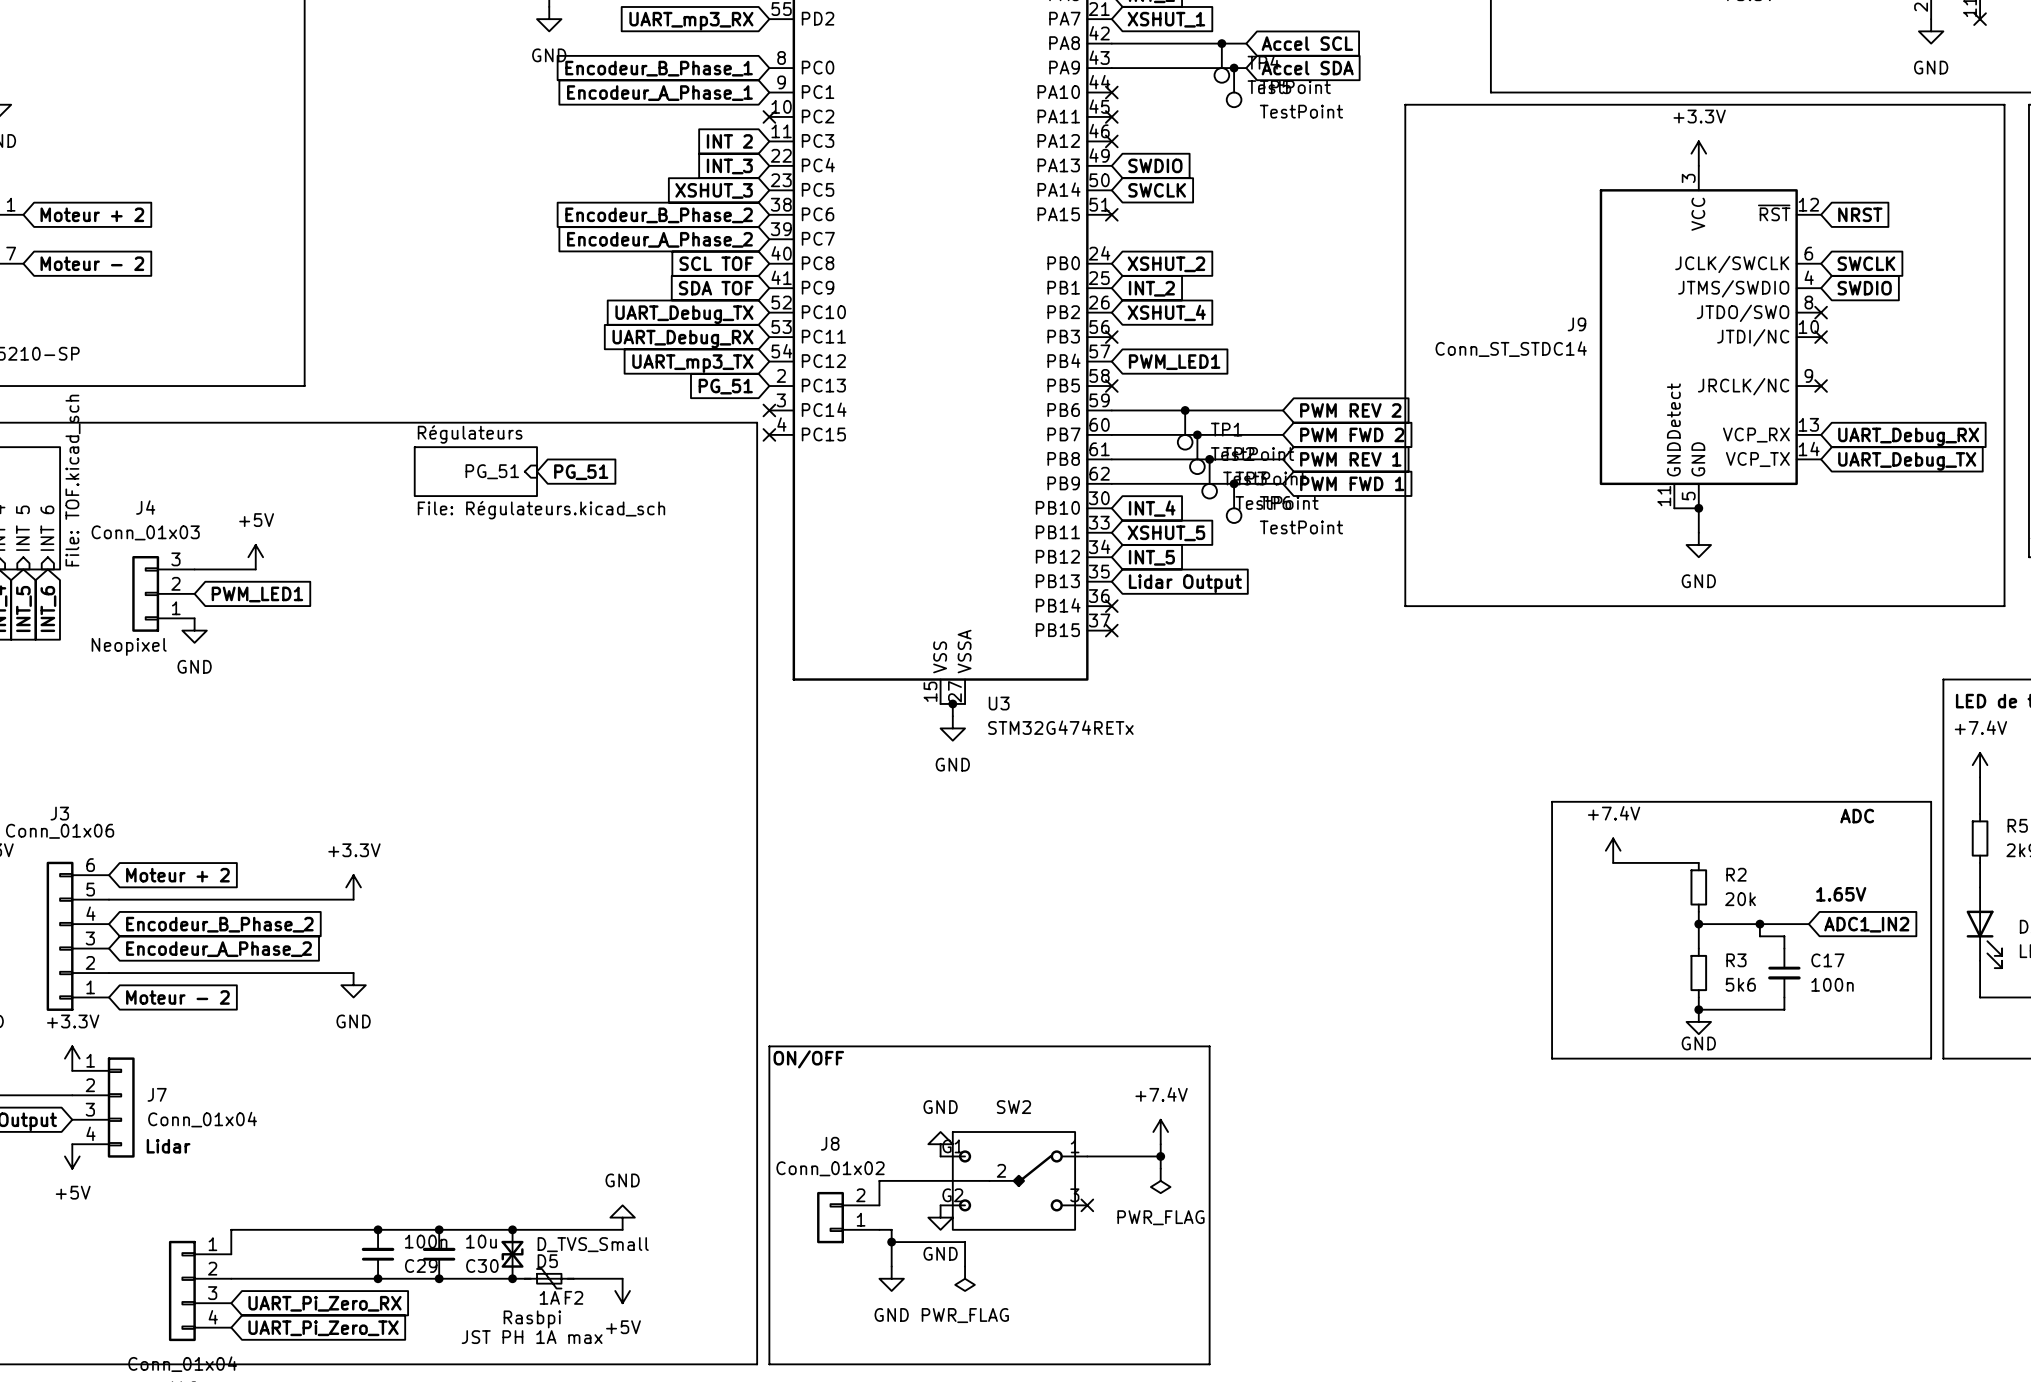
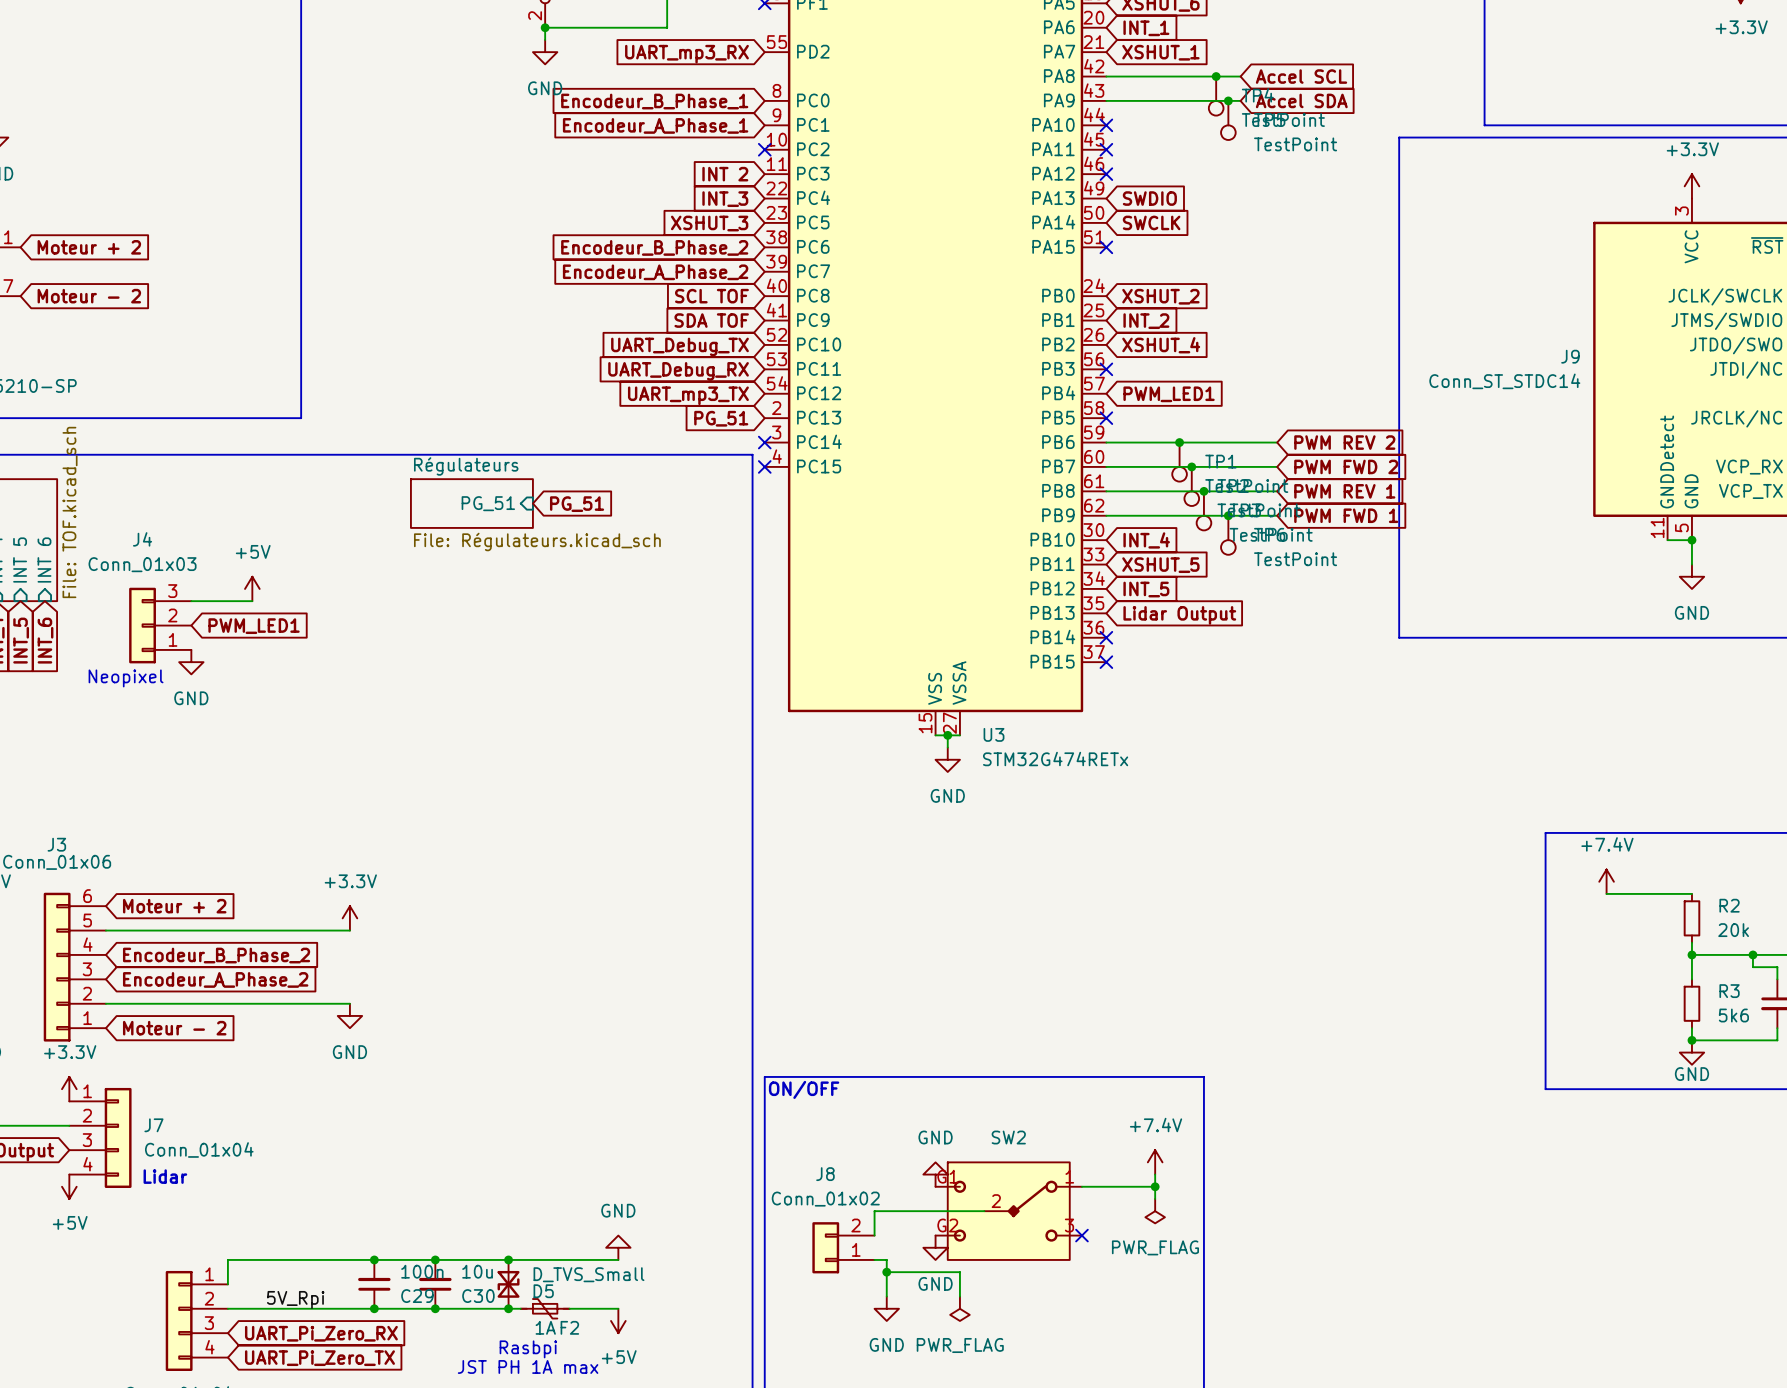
label: none -> 5V_Rpi (295, 1299)

